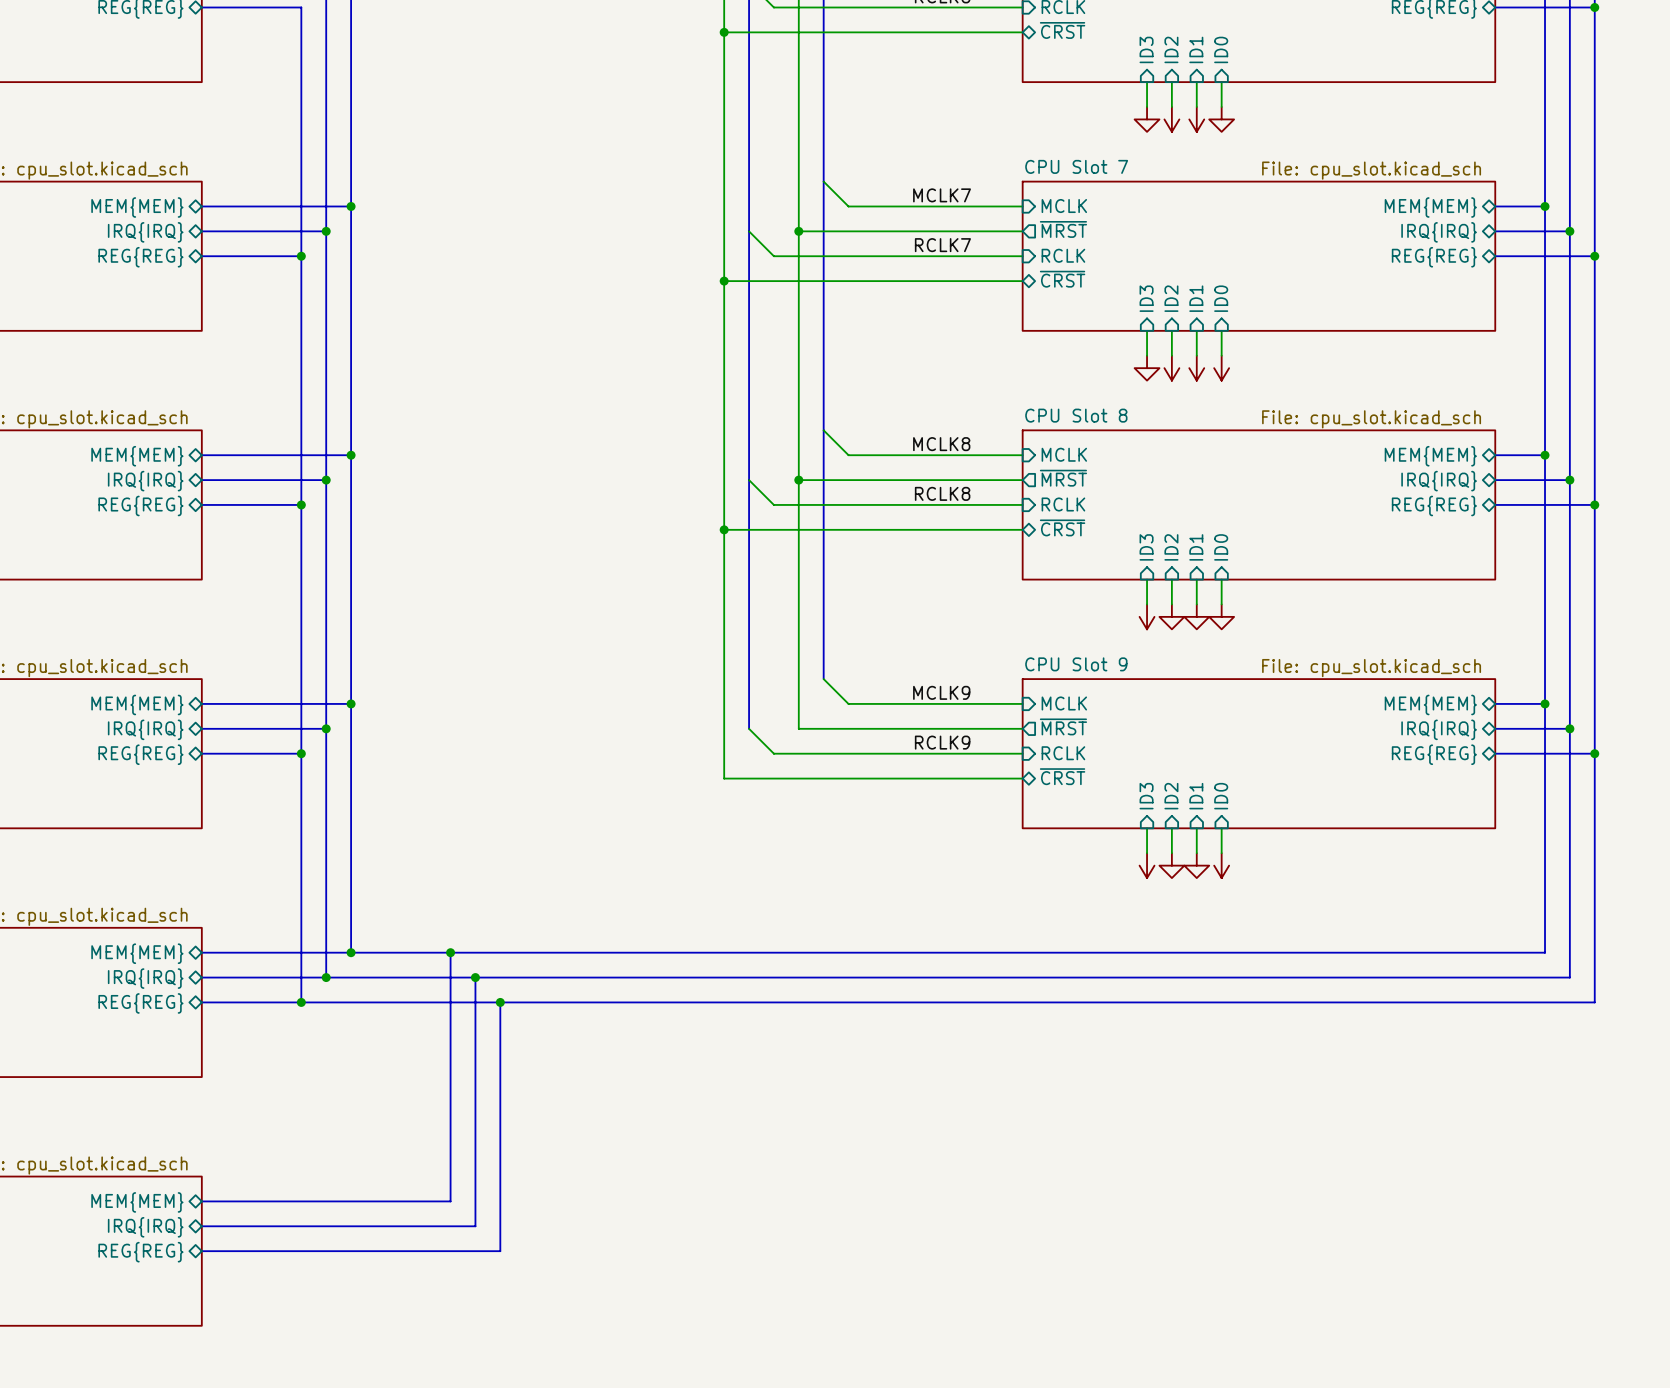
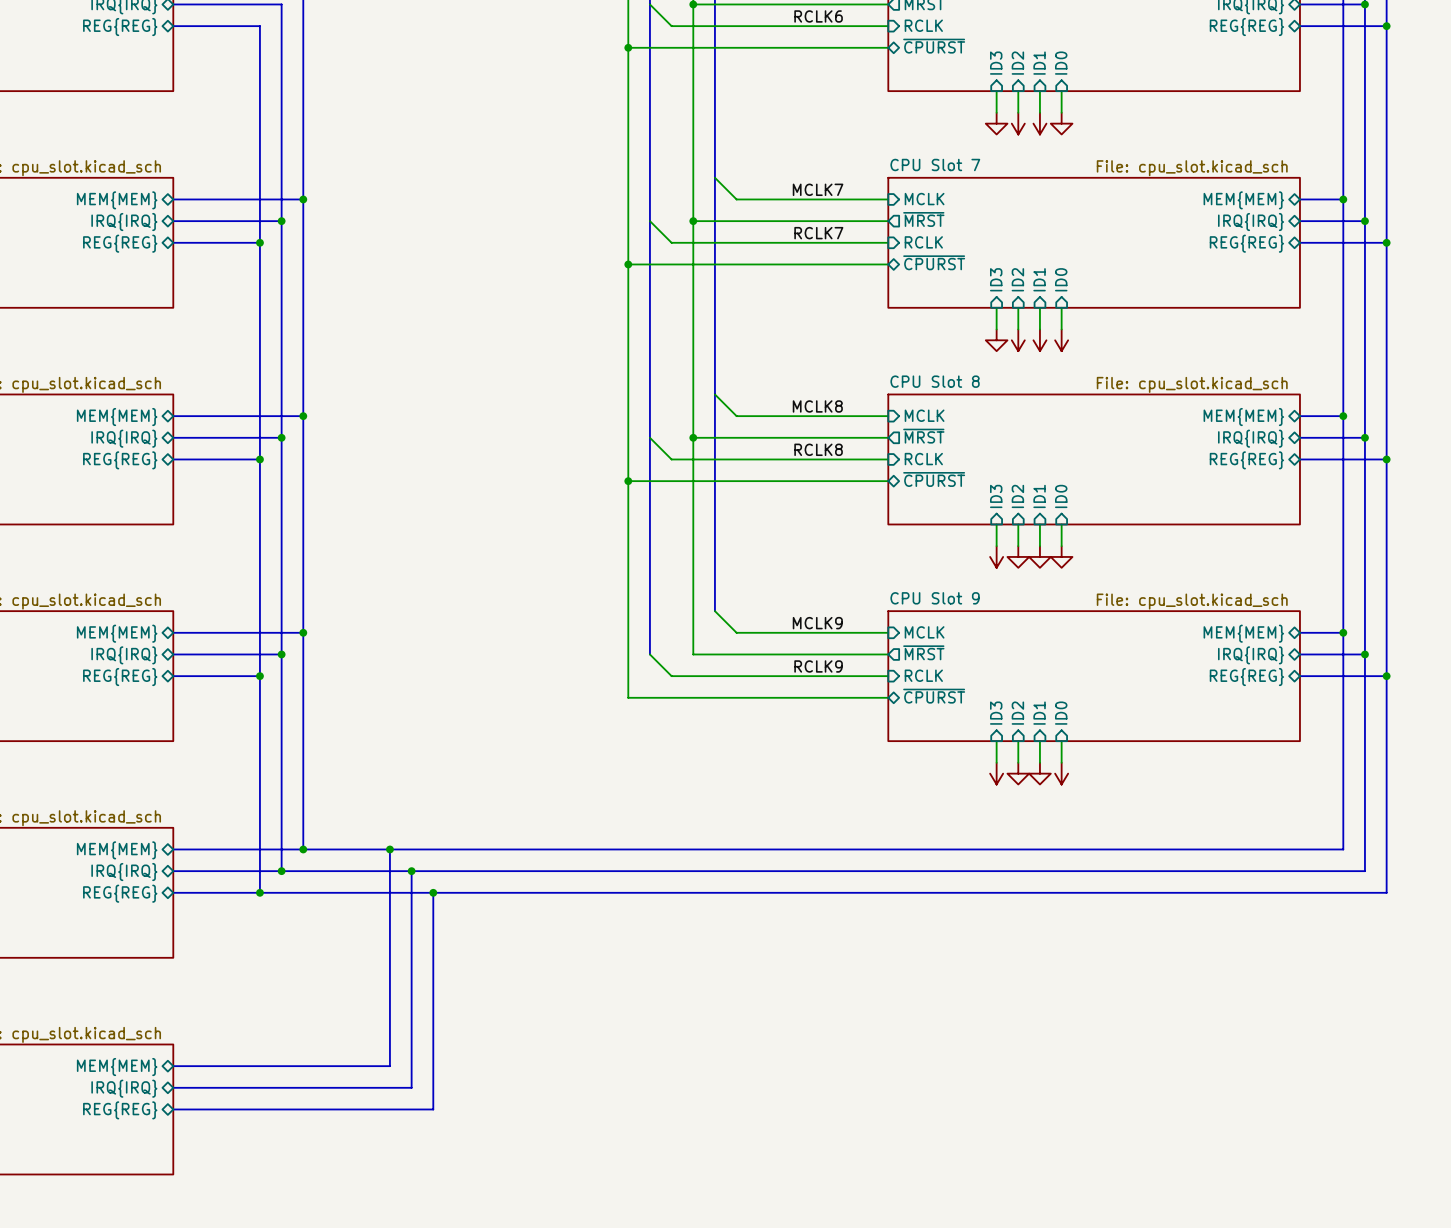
sheet pin: ~{CRST} (1062, 30) -> ~{CPURST} (934, 46)
sheet pin: ~{CRST} (1062, 279) -> ~{CPURST} (934, 262)
sheet pin: ~{CRST} (1062, 527) -> ~{CPURST} (934, 479)
sheet pin: ~{CRST} (1062, 776) -> ~{CPURST} (934, 696)

